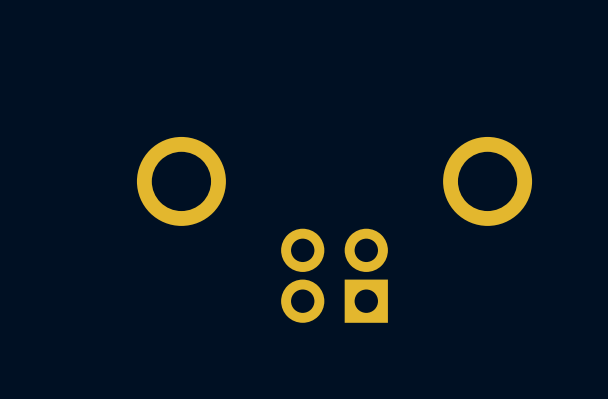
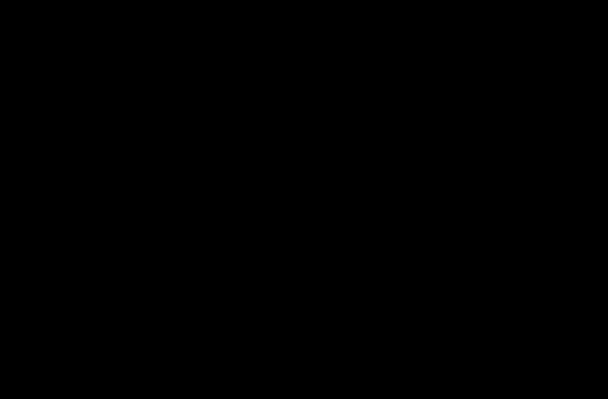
part: (334, 229) -> none

